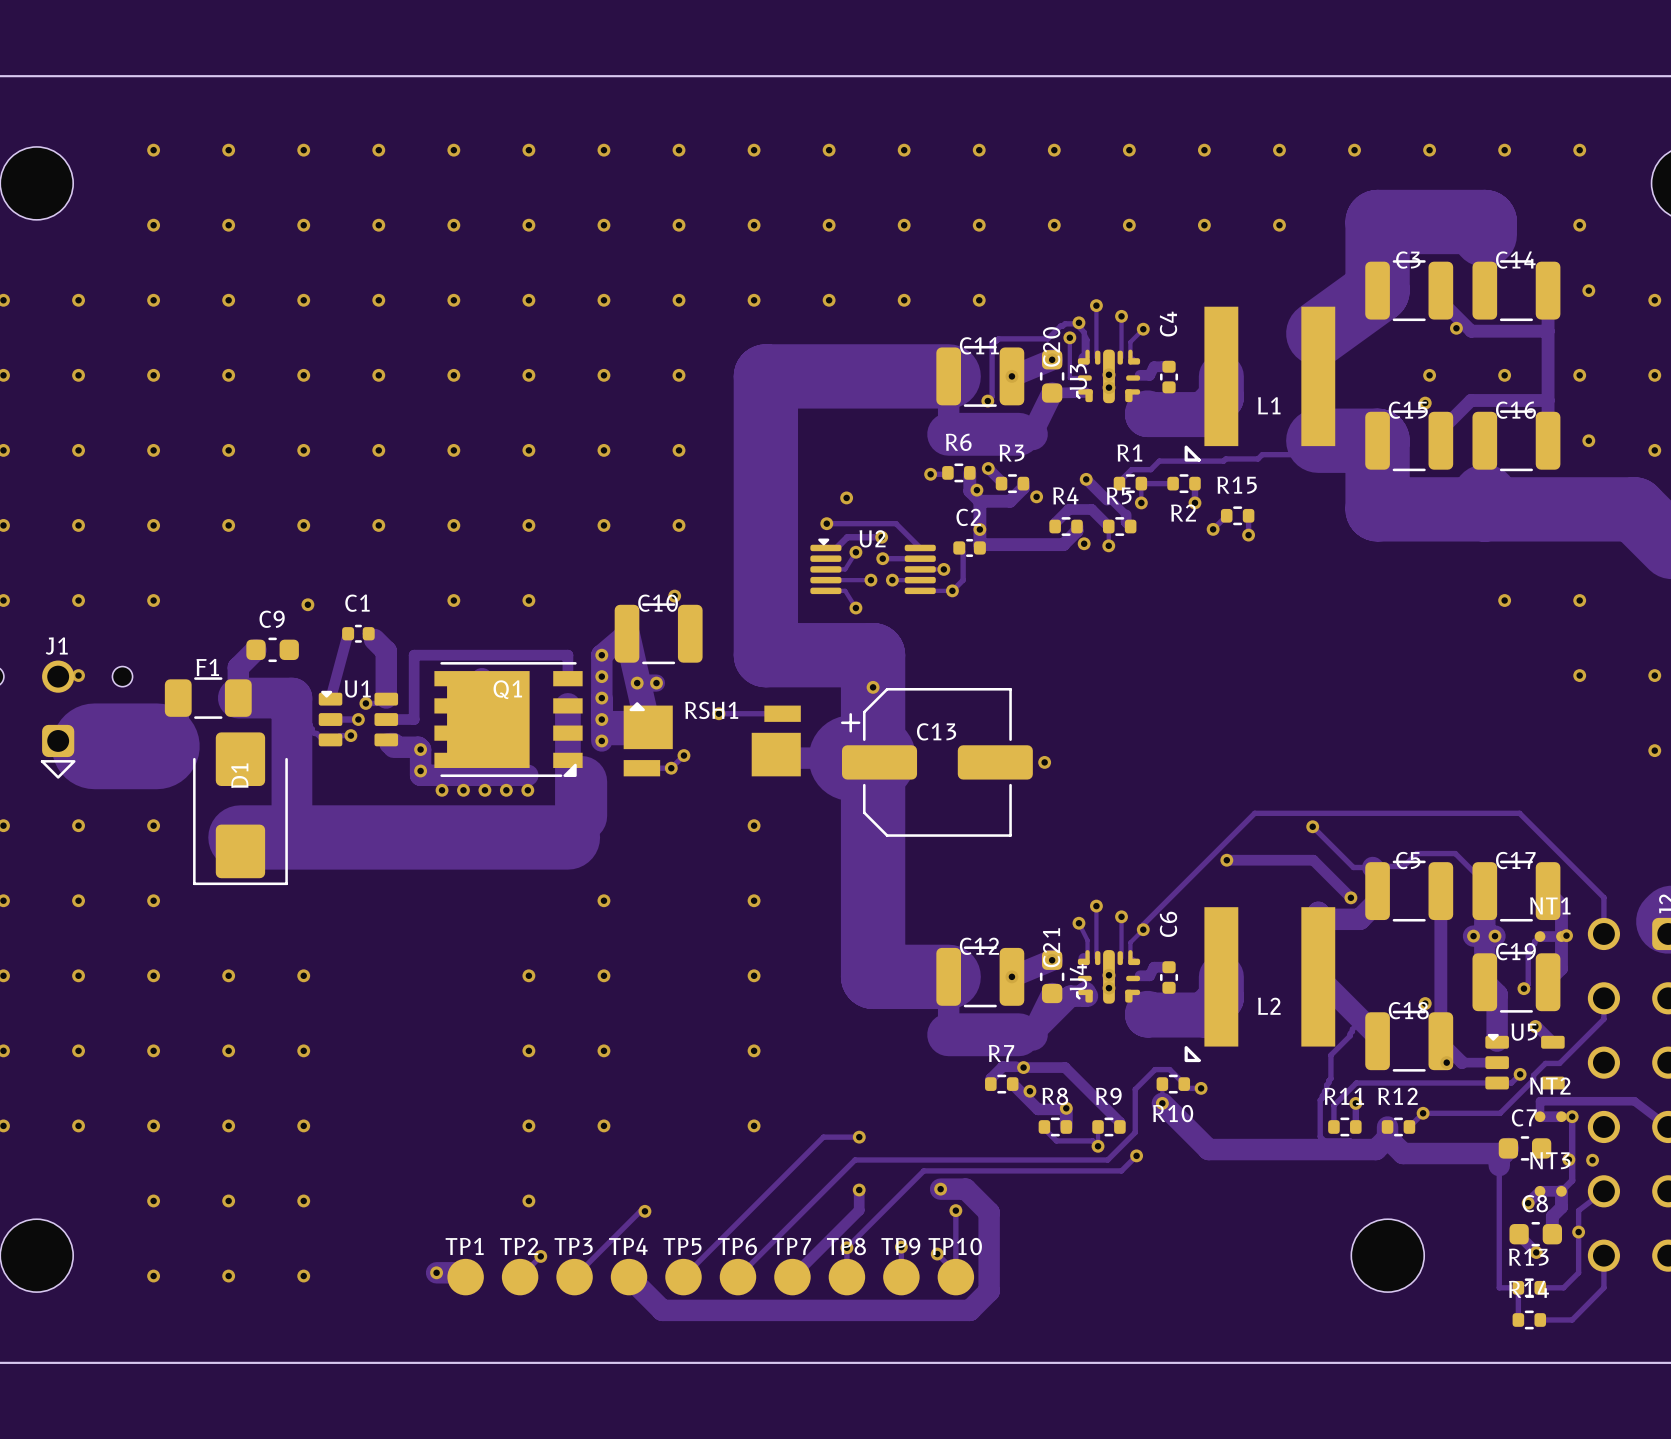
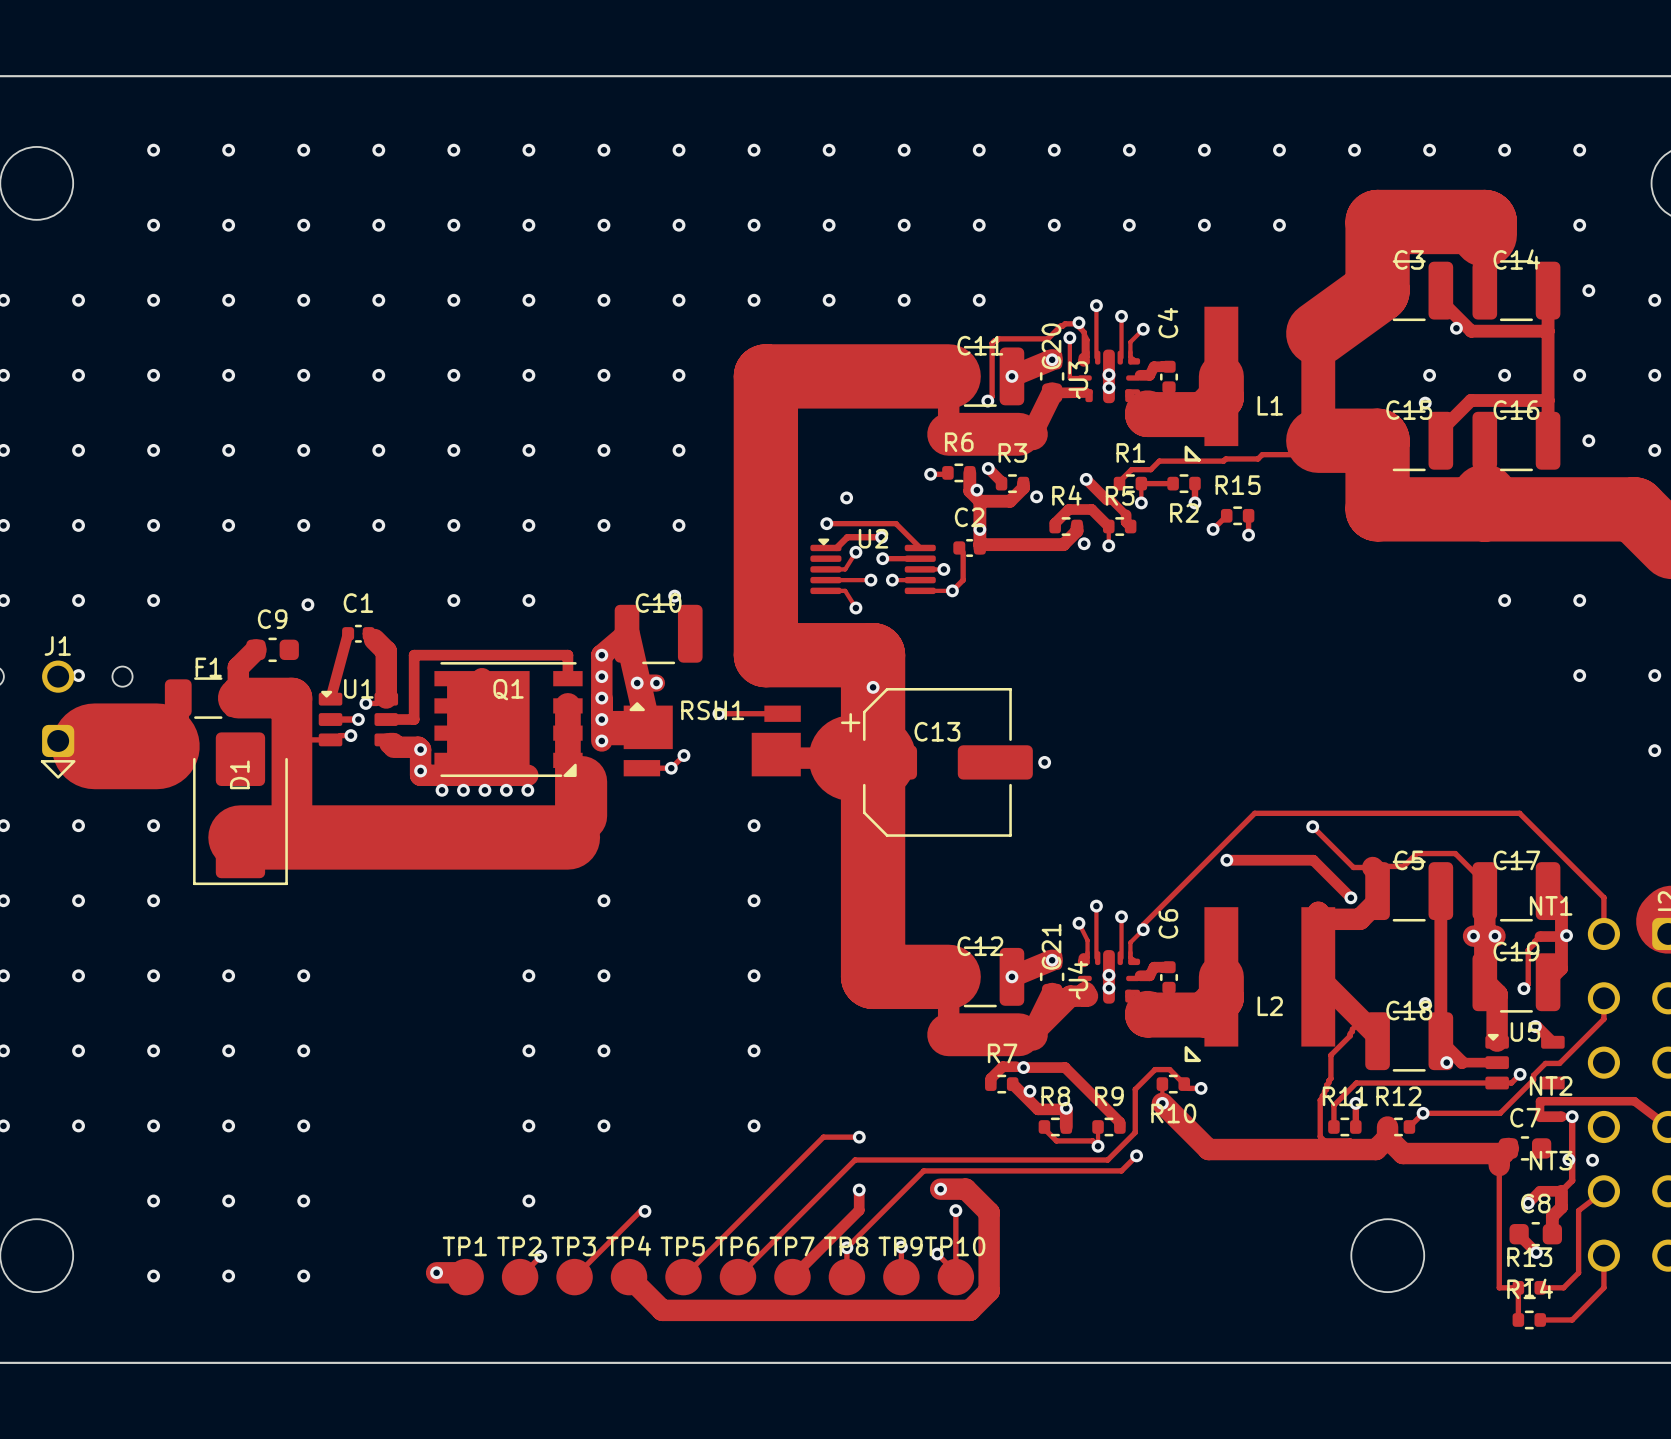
track: (299, 714) (310, 724) (312, 731) (323, 737) -> none
track: none -> (308, 739) (323, 739)
via: (1578, 1232) -> none

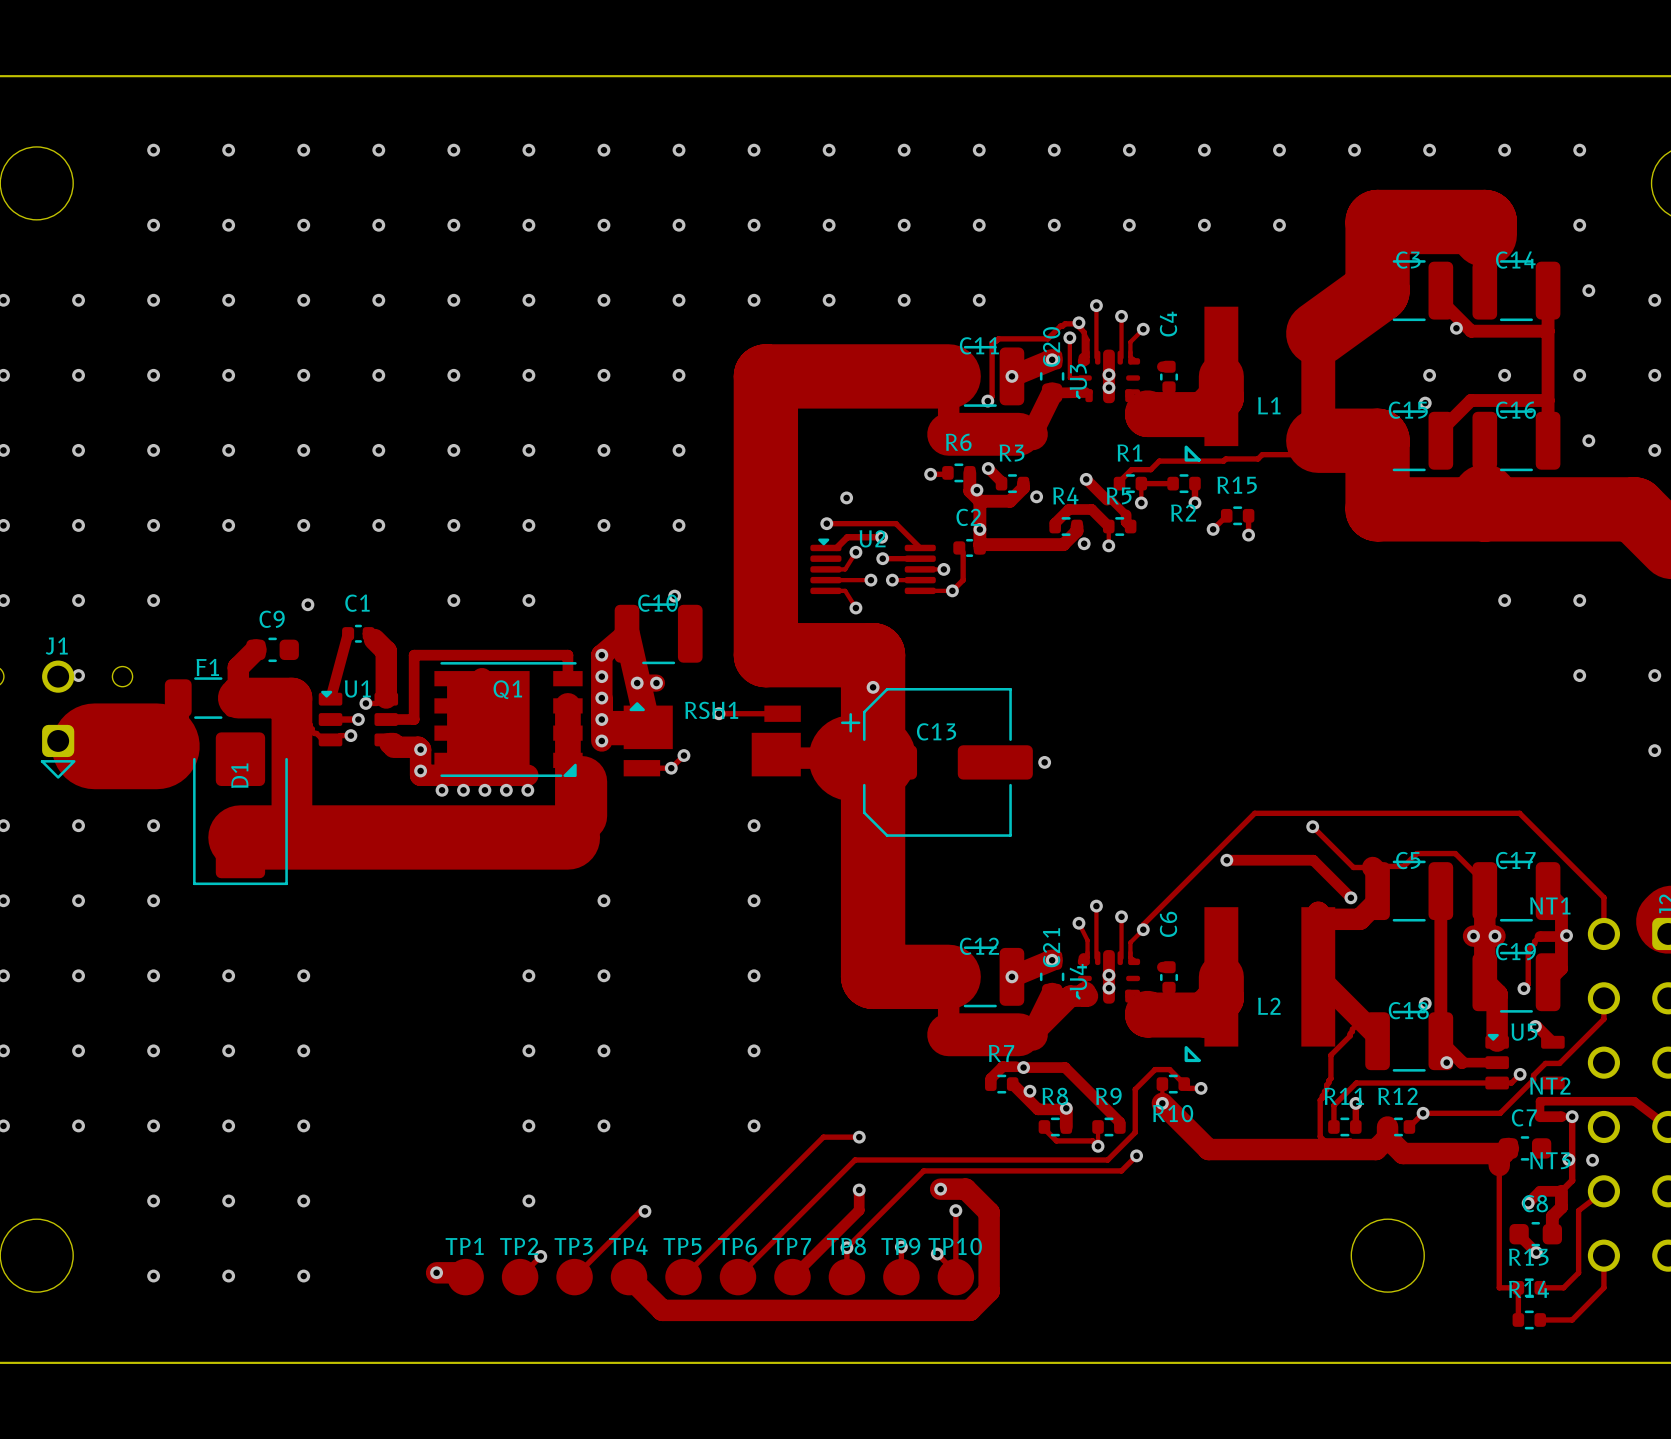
track: (1162, 366) (1154, 366) (1149, 375) (1140, 375) -> none
track: none -> (299, 714) (310, 724) (312, 731) (323, 737)
track: (308, 739) (323, 739) -> none
track: (1162, 967) (1154, 967) (1149, 975) (1140, 975) -> none

